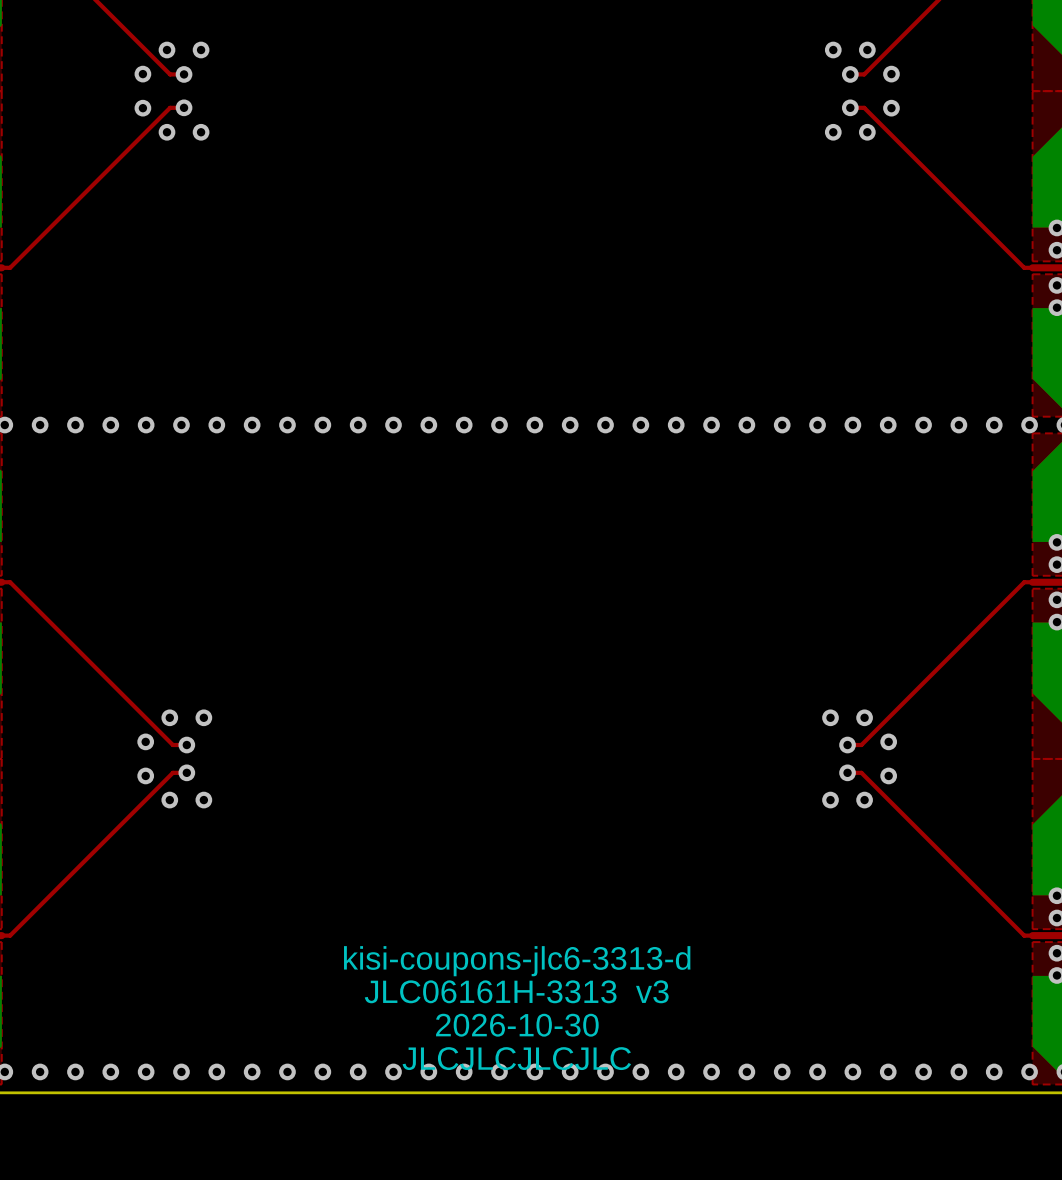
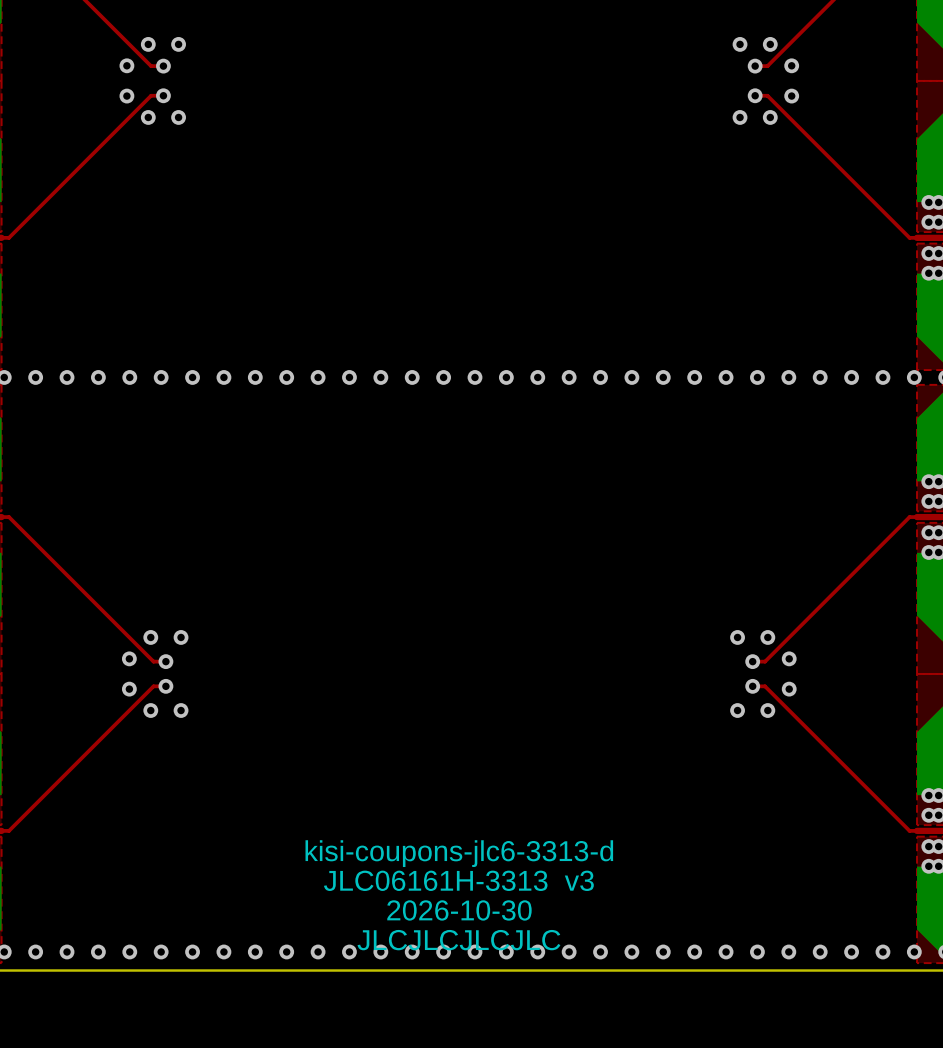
via: none -> (928, 202)
via: none -> (928, 222)
via: none -> (928, 253)
via: none -> (928, 273)
via: none -> (928, 481)
via: none -> (928, 501)
via: none -> (928, 532)
via: none -> (928, 552)
via: none -> (928, 795)
via: none -> (928, 815)
via: none -> (928, 846)
via: none -> (928, 866)

